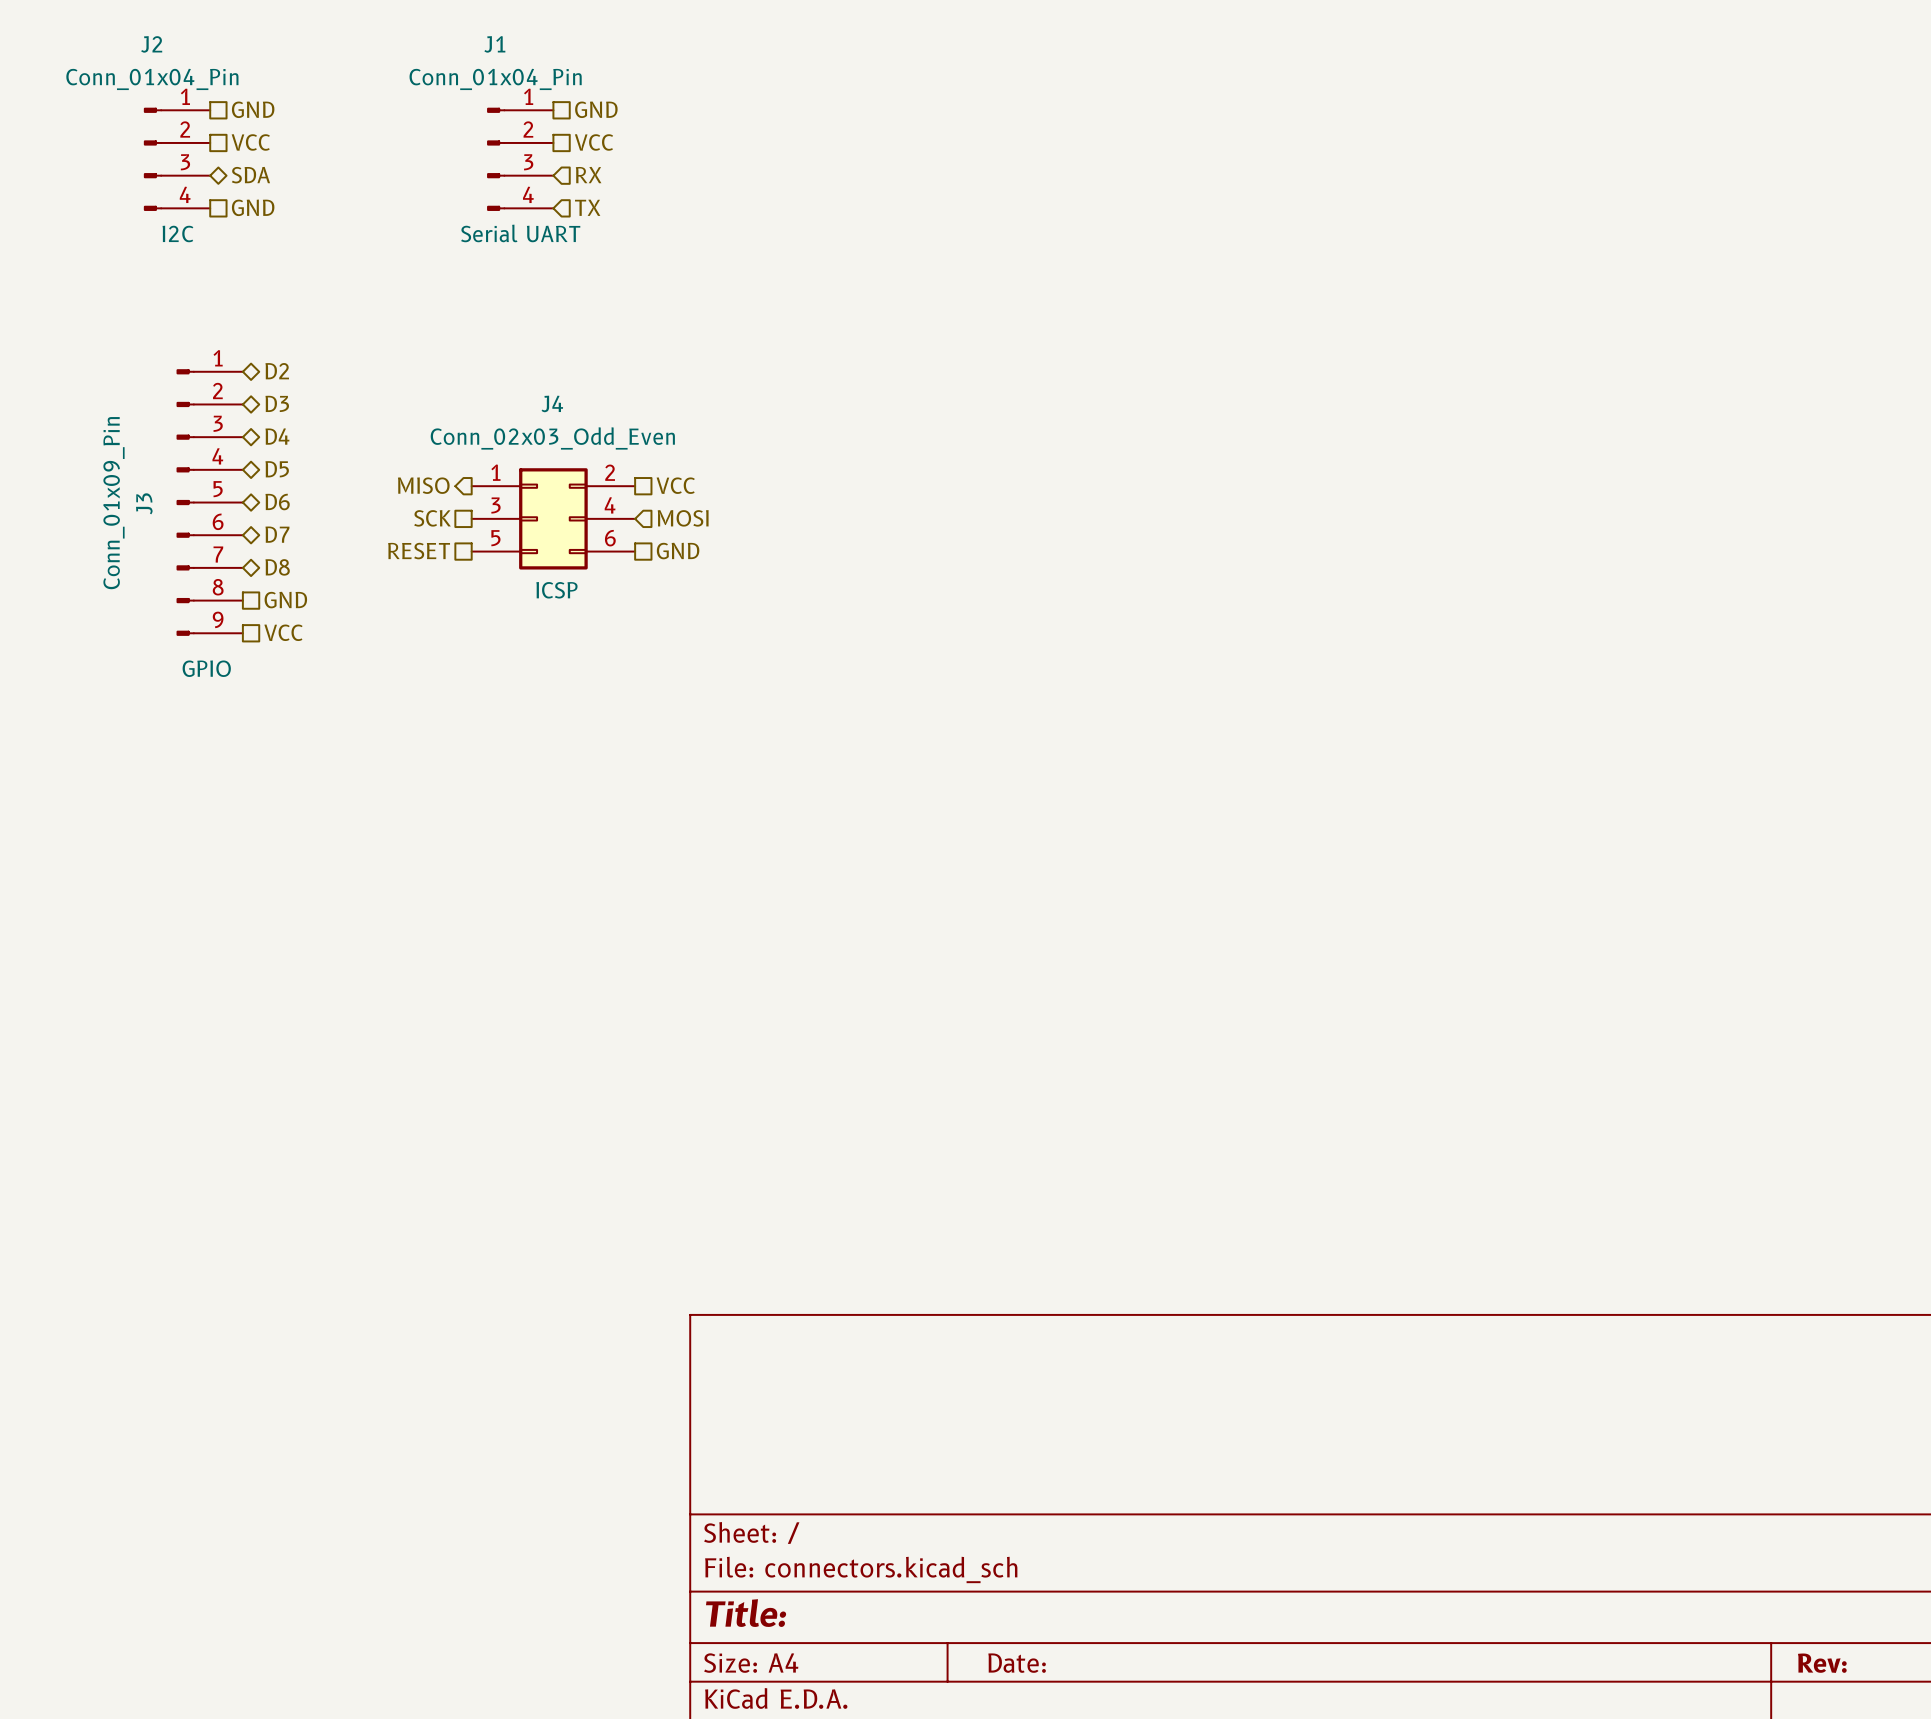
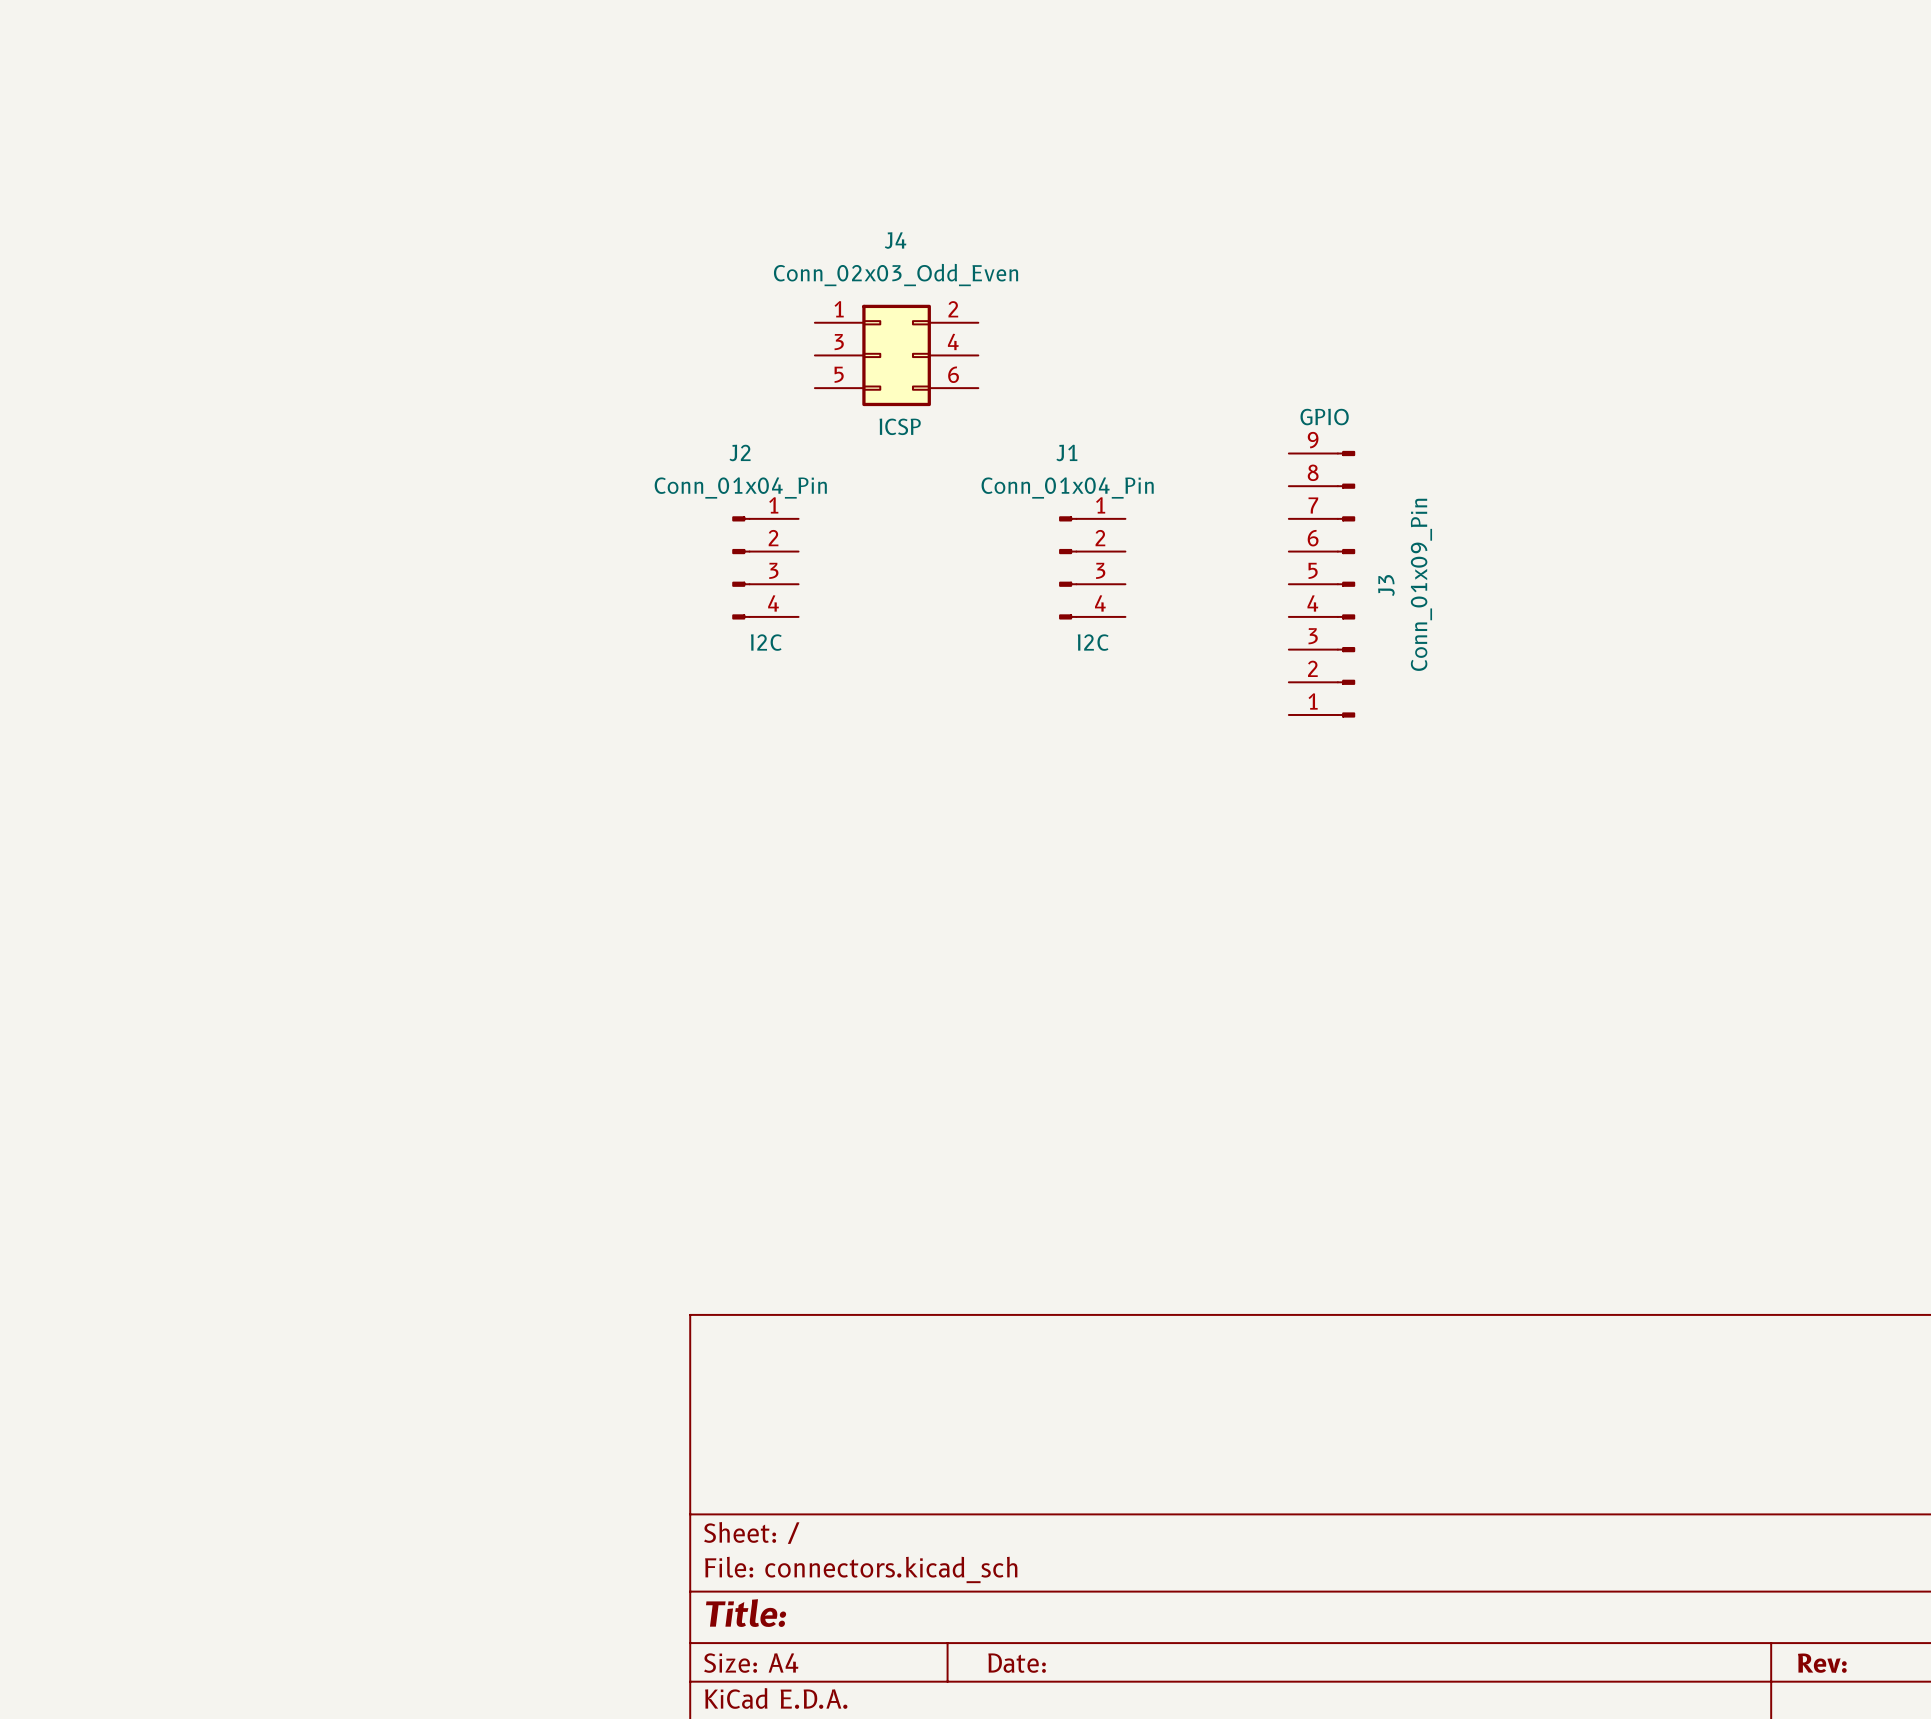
hierarchical label: GND (253, 109) -> none
hierarchical label: GND (596, 109) -> none
hierarchical label: VCC (250, 142) -> none
hierarchical label: VCC (594, 142) -> none
J2 position: (177, 159) -> (765, 567)
J1 position: (520, 159) -> (1092, 567)
hierarchical label: SDA (250, 175) -> none
hierarchical label: RX (588, 175) -> none
hierarchical label: GND (253, 207) -> none
hierarchical label: TX (587, 207) -> none
J1 text: Serial UART (520, 233) -> I2C (1093, 642)
hierarchical label: D2 (277, 371) -> none
hierarchical label: D3 (277, 403) -> none
hierarchical label: D4 (277, 436) -> none
hierarchical label: D5 (277, 469) -> none
hierarchical label: MISO (423, 485) -> none
hierarchical label: VCC (675, 485) -> none
J3 rotation: 0° (185, 502) -> 180° (1346, 584)
J3 position: (209, 502) -> (1322, 584)
hierarchical label: D6 (277, 502) -> none
hierarchical label: SCK (432, 518) -> none
J4 position: (553, 518) -> (896, 355)
hierarchical label: MOSI (683, 518) -> none
hierarchical label: D7 (277, 534) -> none
hierarchical label: RESET (419, 551) -> none
hierarchical label: GND (678, 551) -> none
hierarchical label: D8 (277, 567) -> none
hierarchical label: GND (285, 600) -> none
hierarchical label: VCC (283, 632) -> none

